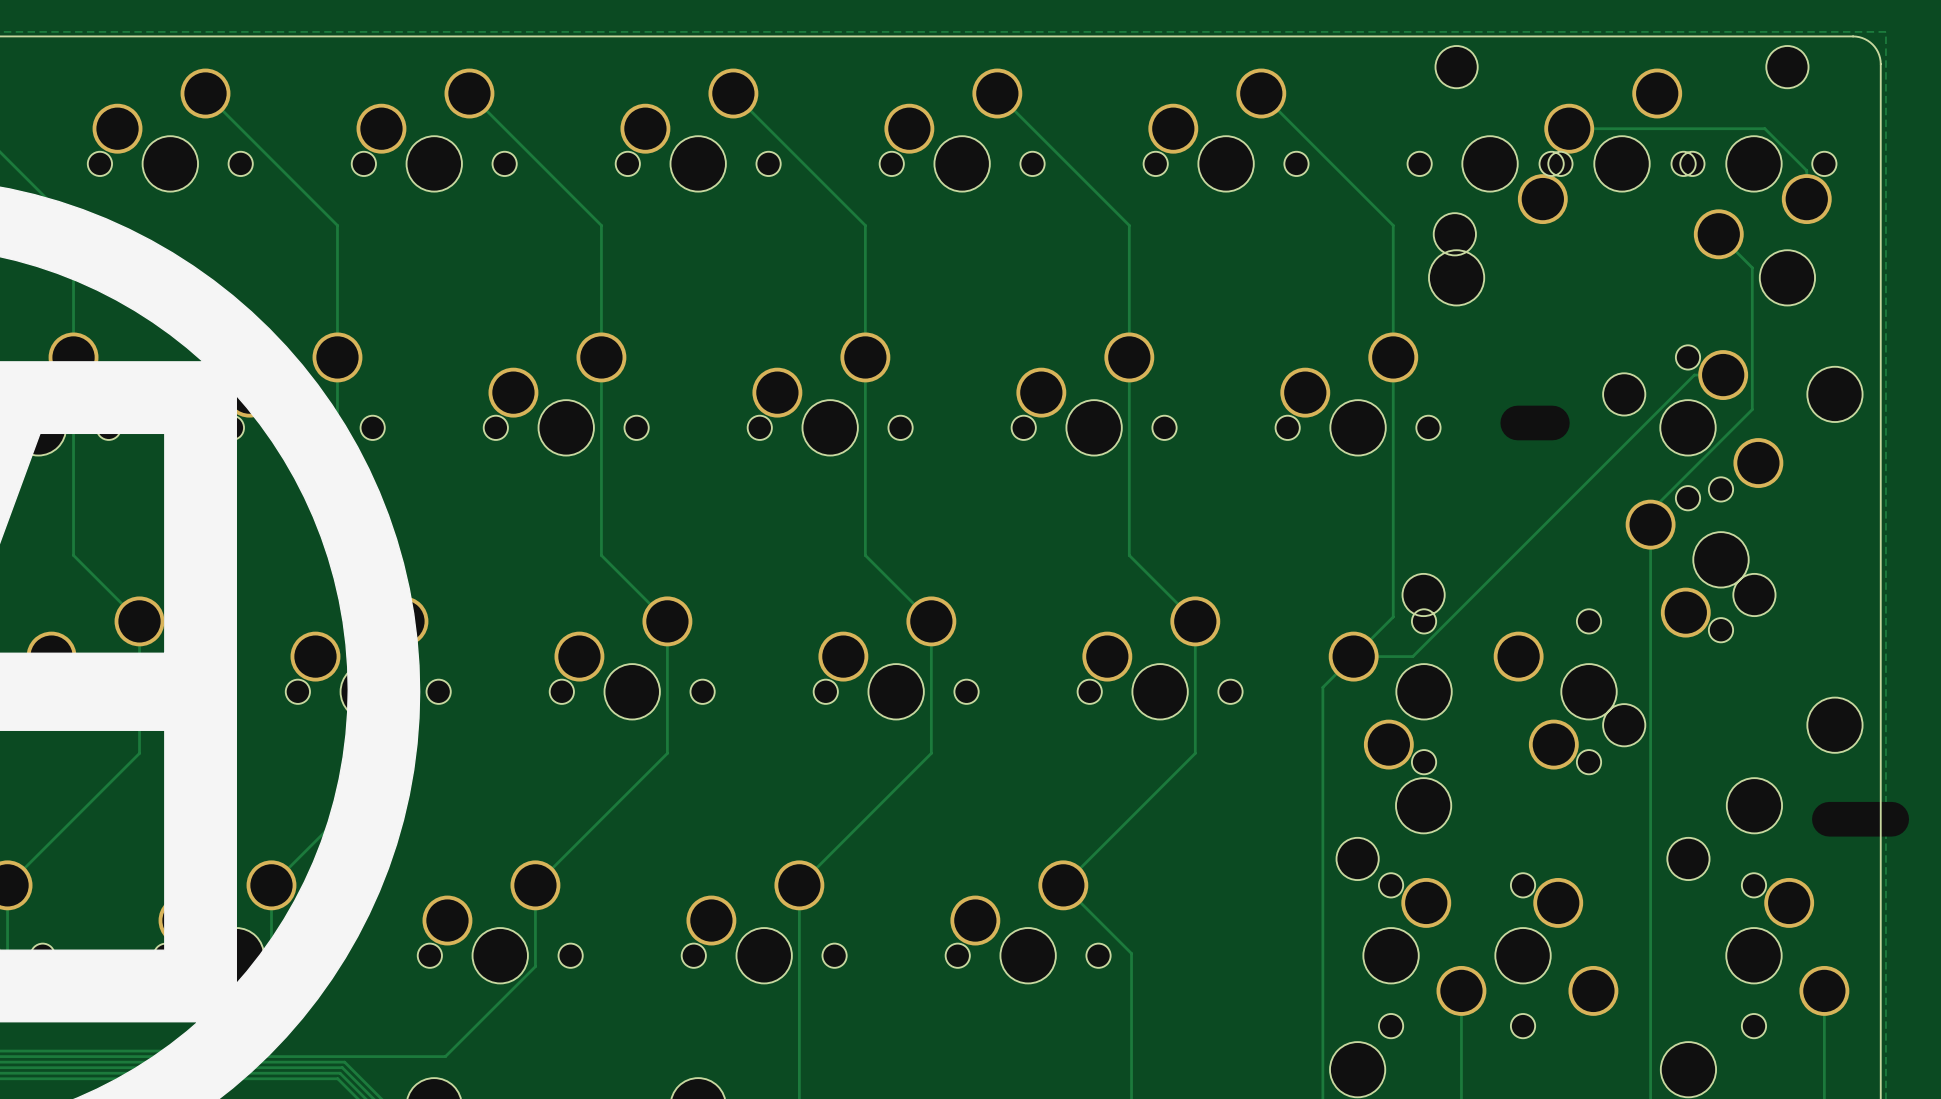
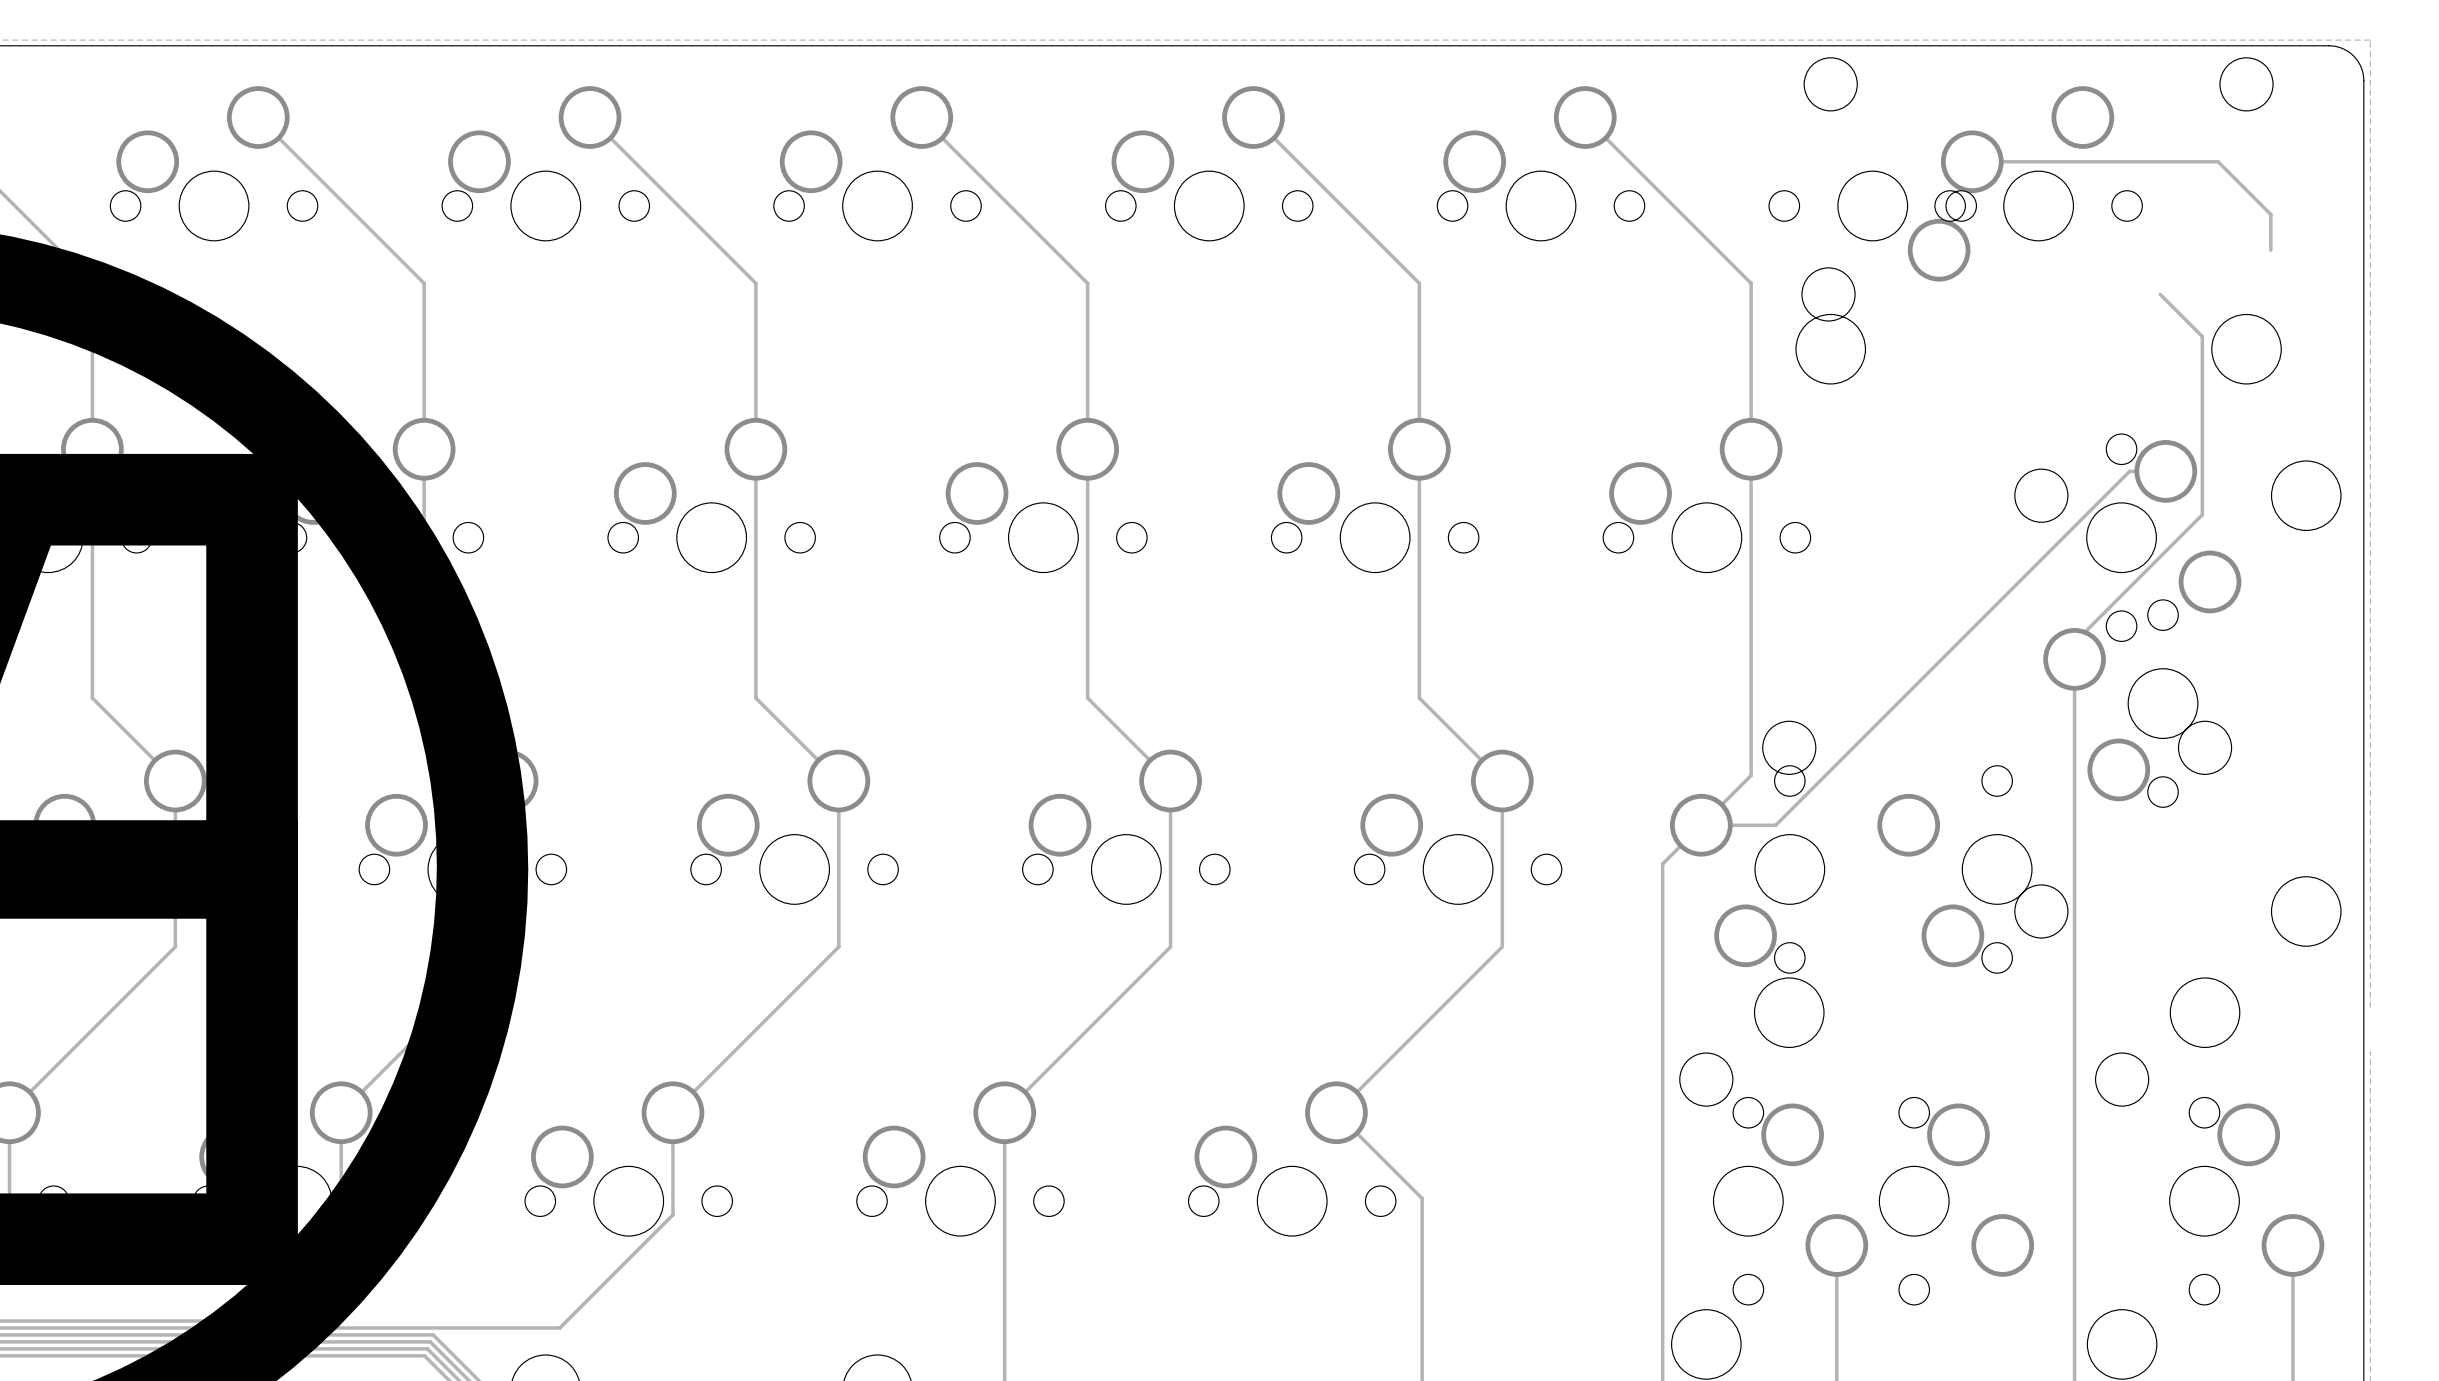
part: (1753, 197) -> none

